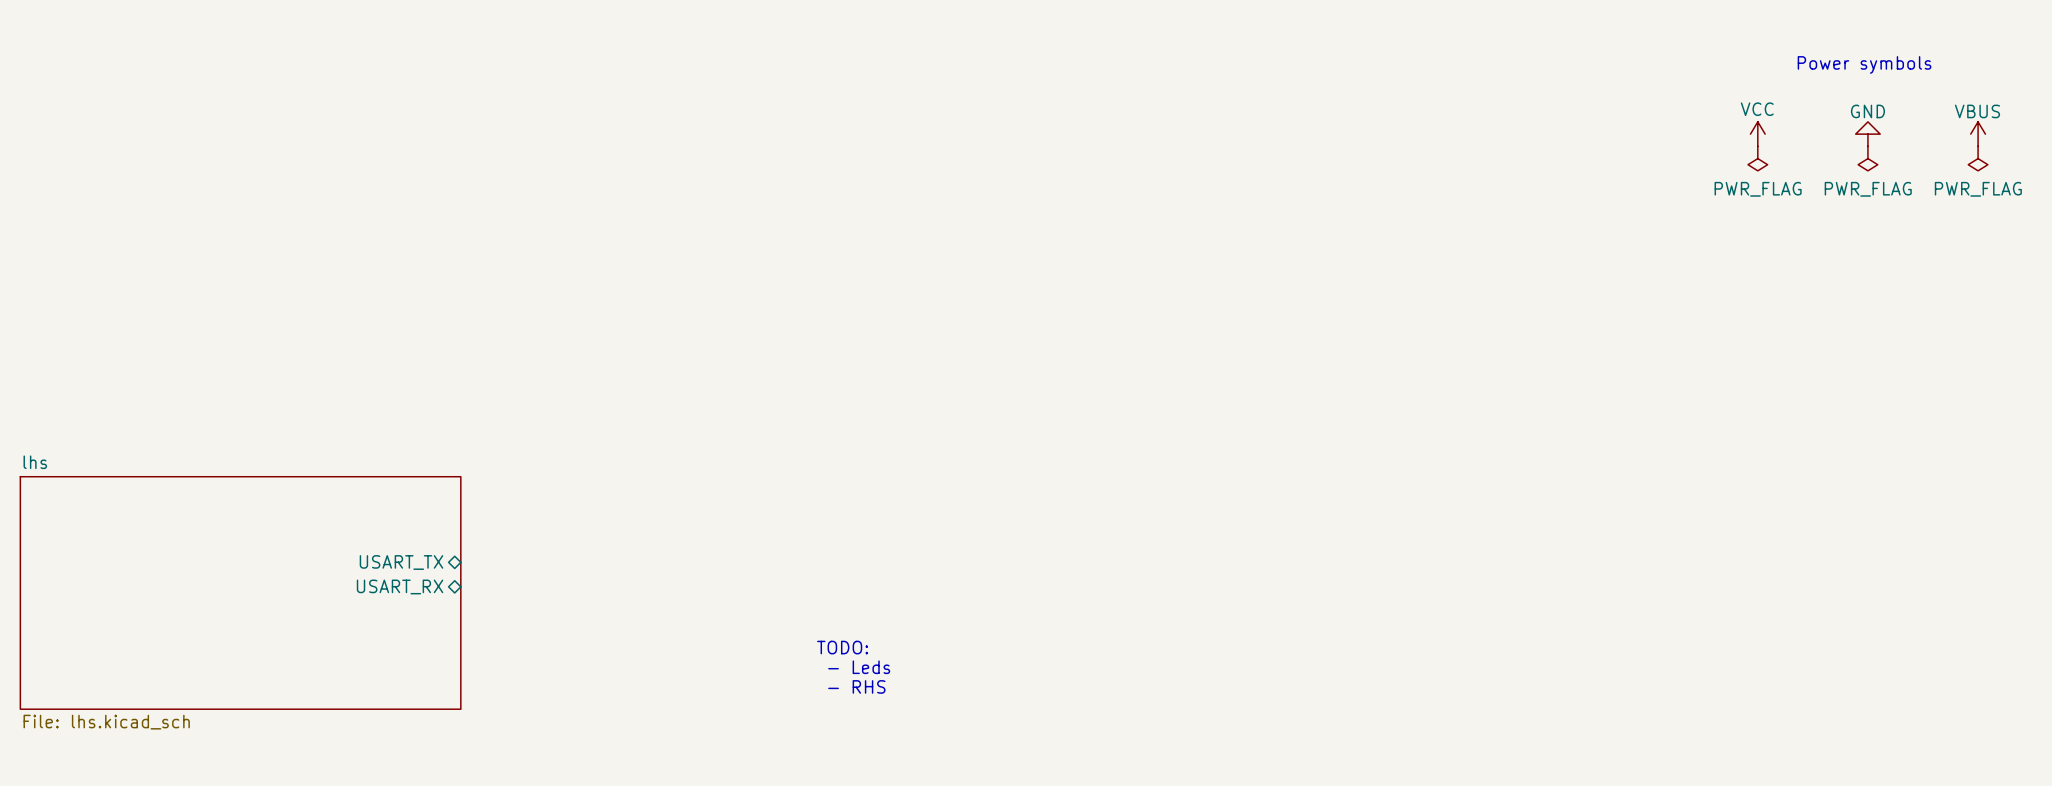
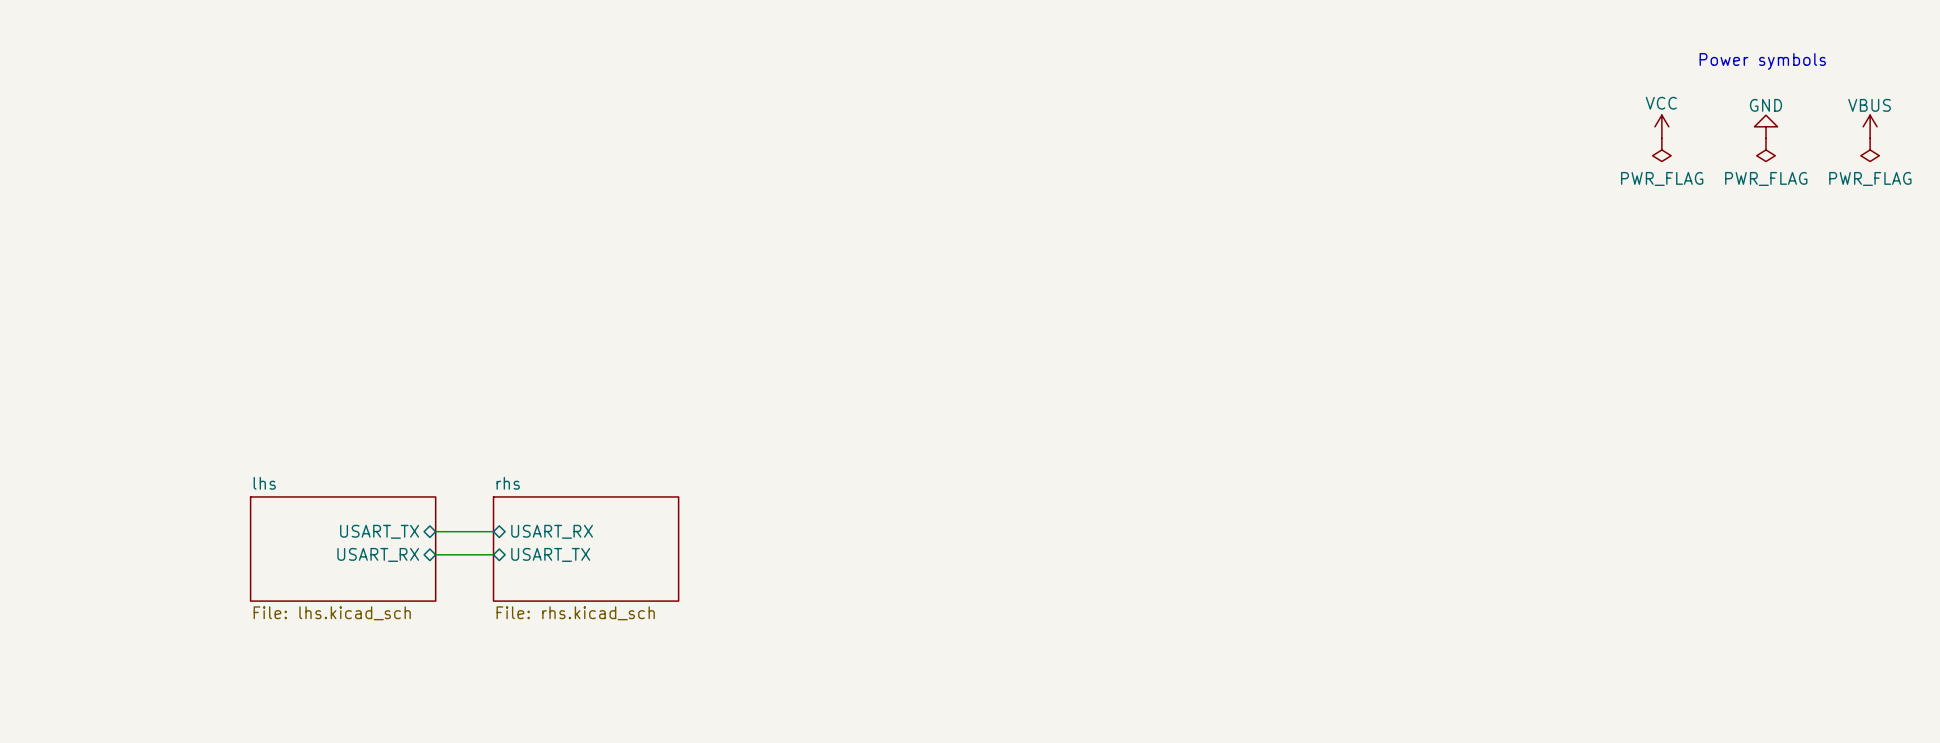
wire: none -> (435, 531) (493, 531)
sheet pin: none -> USART_RX (552, 531)
sheet lhs: none -> File: lhs.kicad_sch (343, 549)
sheet rhs: none -> File: rhs.kicad_sch (586, 549)
wire: none -> (435, 554) (493, 554)
sheet pin: none -> USART_TX (550, 554)
sheet lhs: File: lhs.kicad_sch (240, 592) -> none
text: TODO: (842, 647) -> none
text: - Leds (859, 667) -> none
text: - RHS (856, 686) -> none

